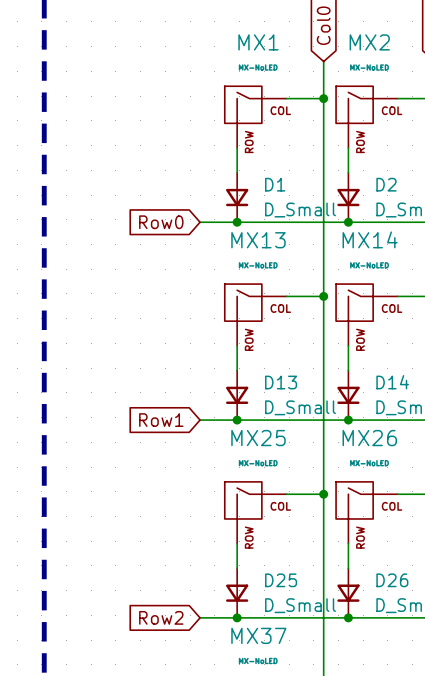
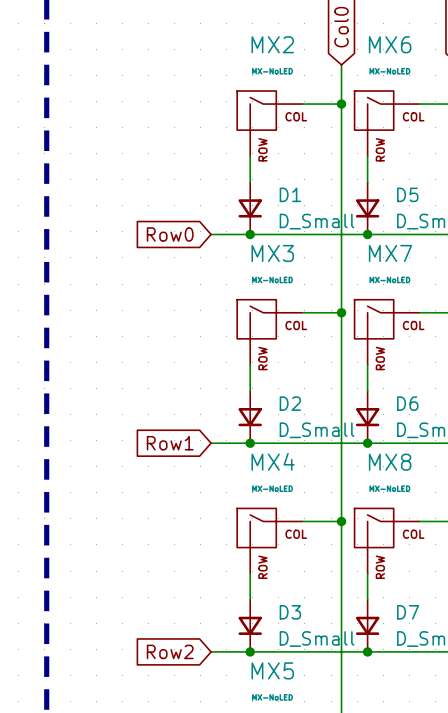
MX1 name: MX1 (258, 42) -> MX2 (272, 44)
MX2 name: MX2 (369, 42) -> MX6 (390, 44)
D2 name: D2 (386, 184) -> D5 (407, 194)
MX14 name: MX14 (370, 239) -> MX7 (390, 253)
MX13 name: MX13 (258, 240) -> MX3 (272, 253)
D13 name: D13 (281, 382) -> D2 (290, 403)
D14 name: D14 (392, 382) -> D6 (407, 403)
MX25 name: MX25 (258, 438) -> MX4 (273, 461)
MX26 name: MX26 (369, 438) -> MX8 (390, 462)
D25 name: D25 (281, 580) -> D3 (290, 612)
D26 name: D26 (392, 580) -> D7 (408, 612)
MX37 name: MX37 (258, 635) -> MX5 (272, 670)

